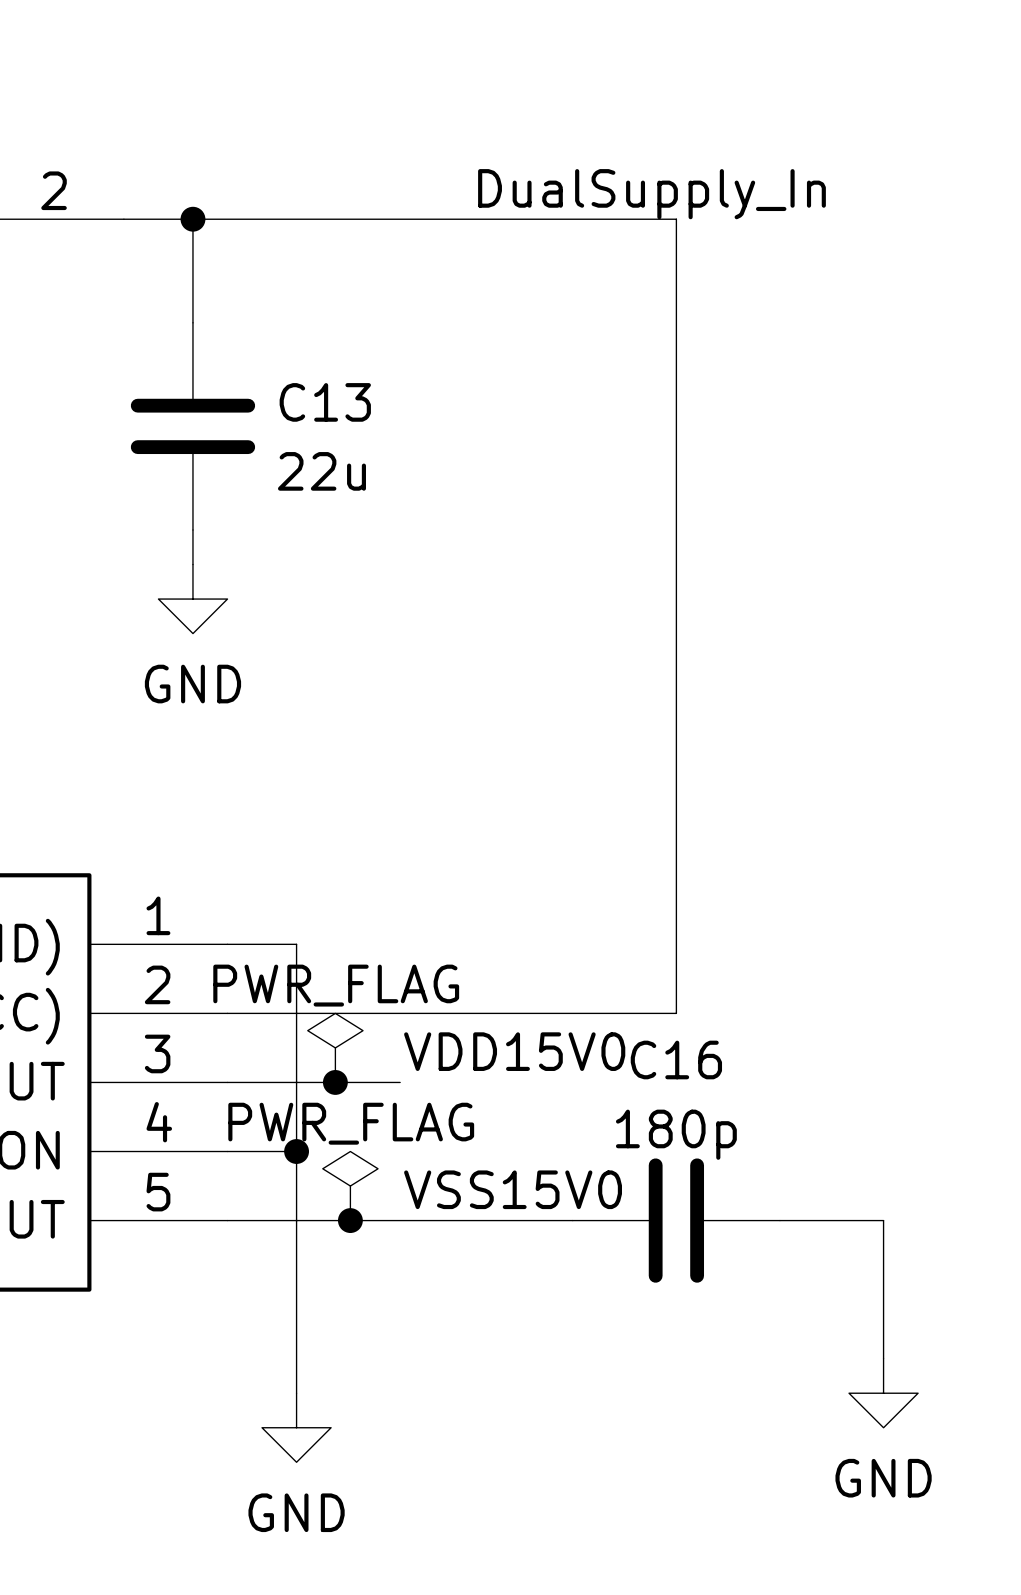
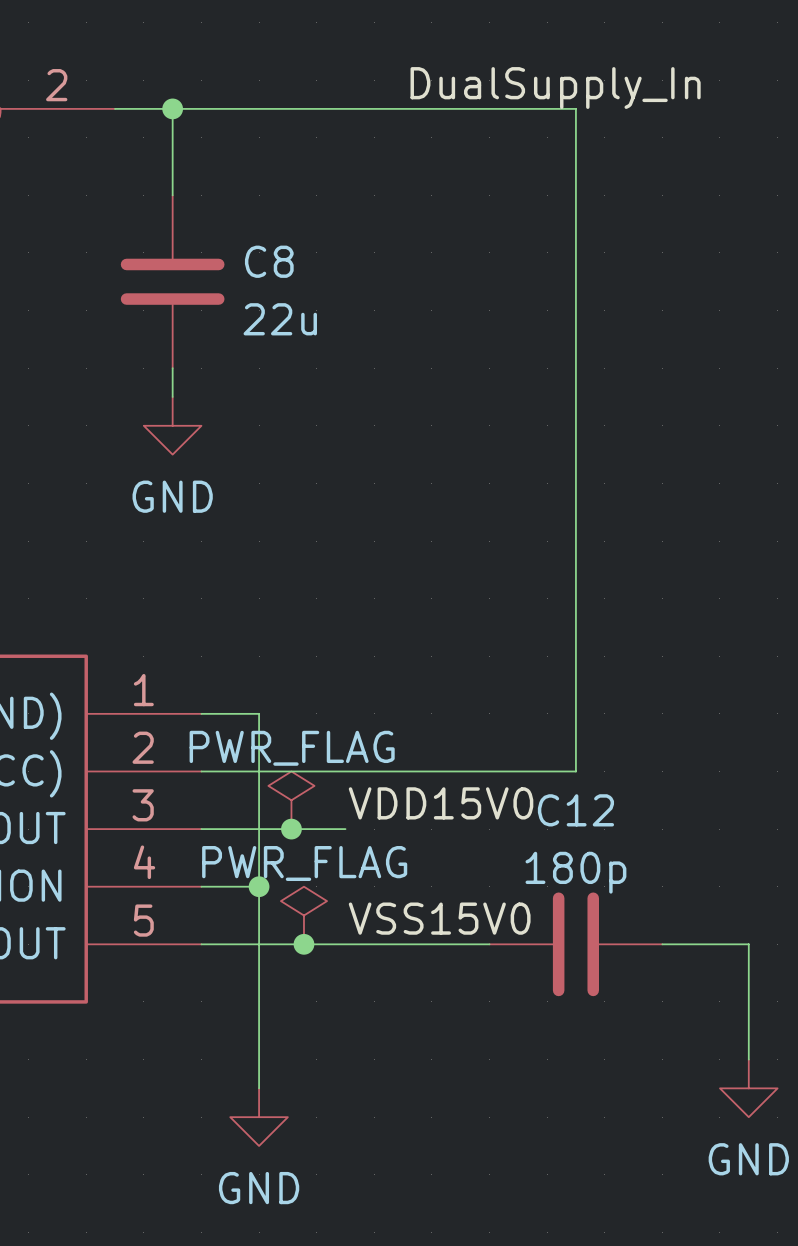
C13 name: C13 (325, 402) -> C8 (269, 261)
C16 name: C16 (676, 1059) -> C12 (575, 810)

